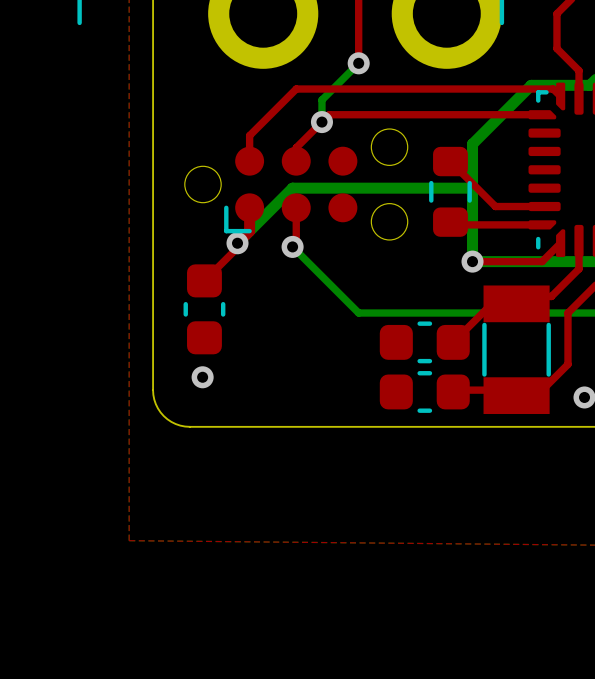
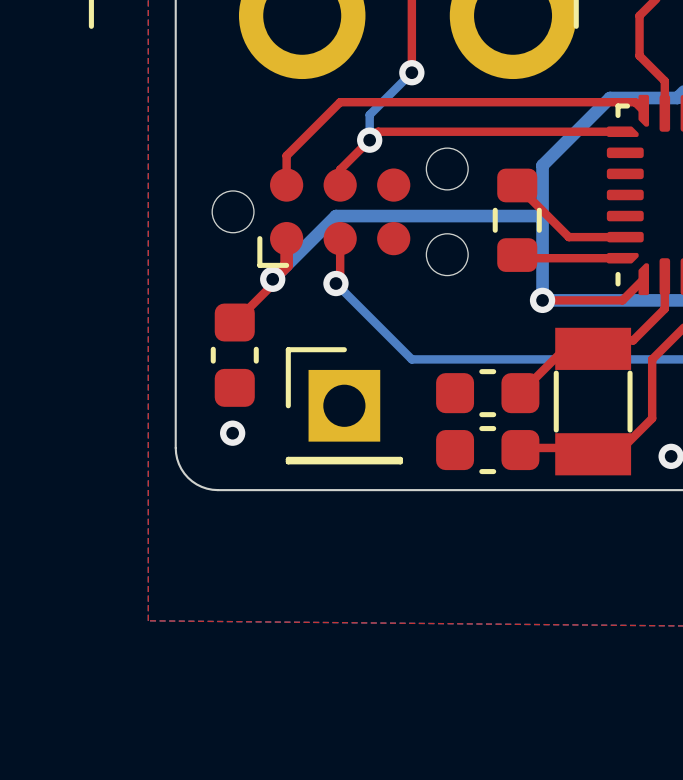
part: none -> (344, 405)

